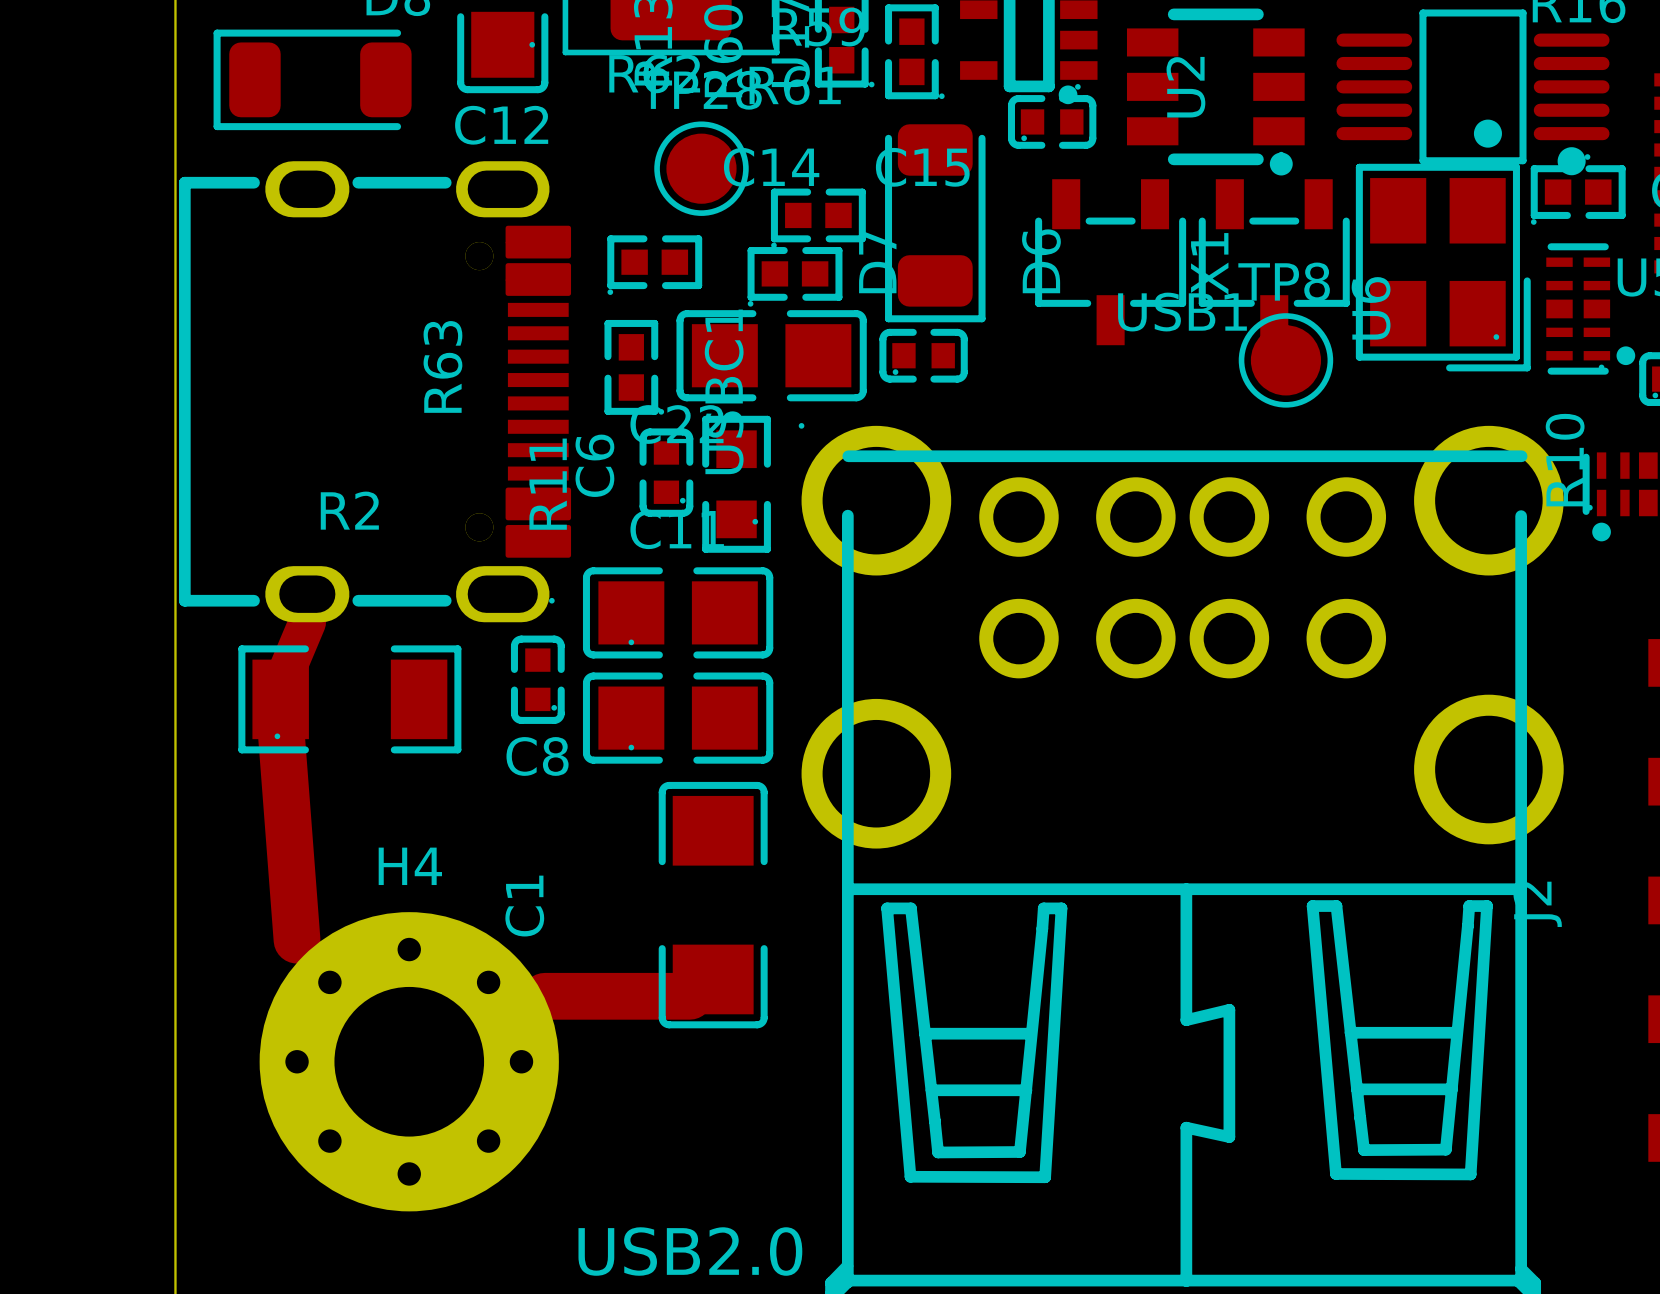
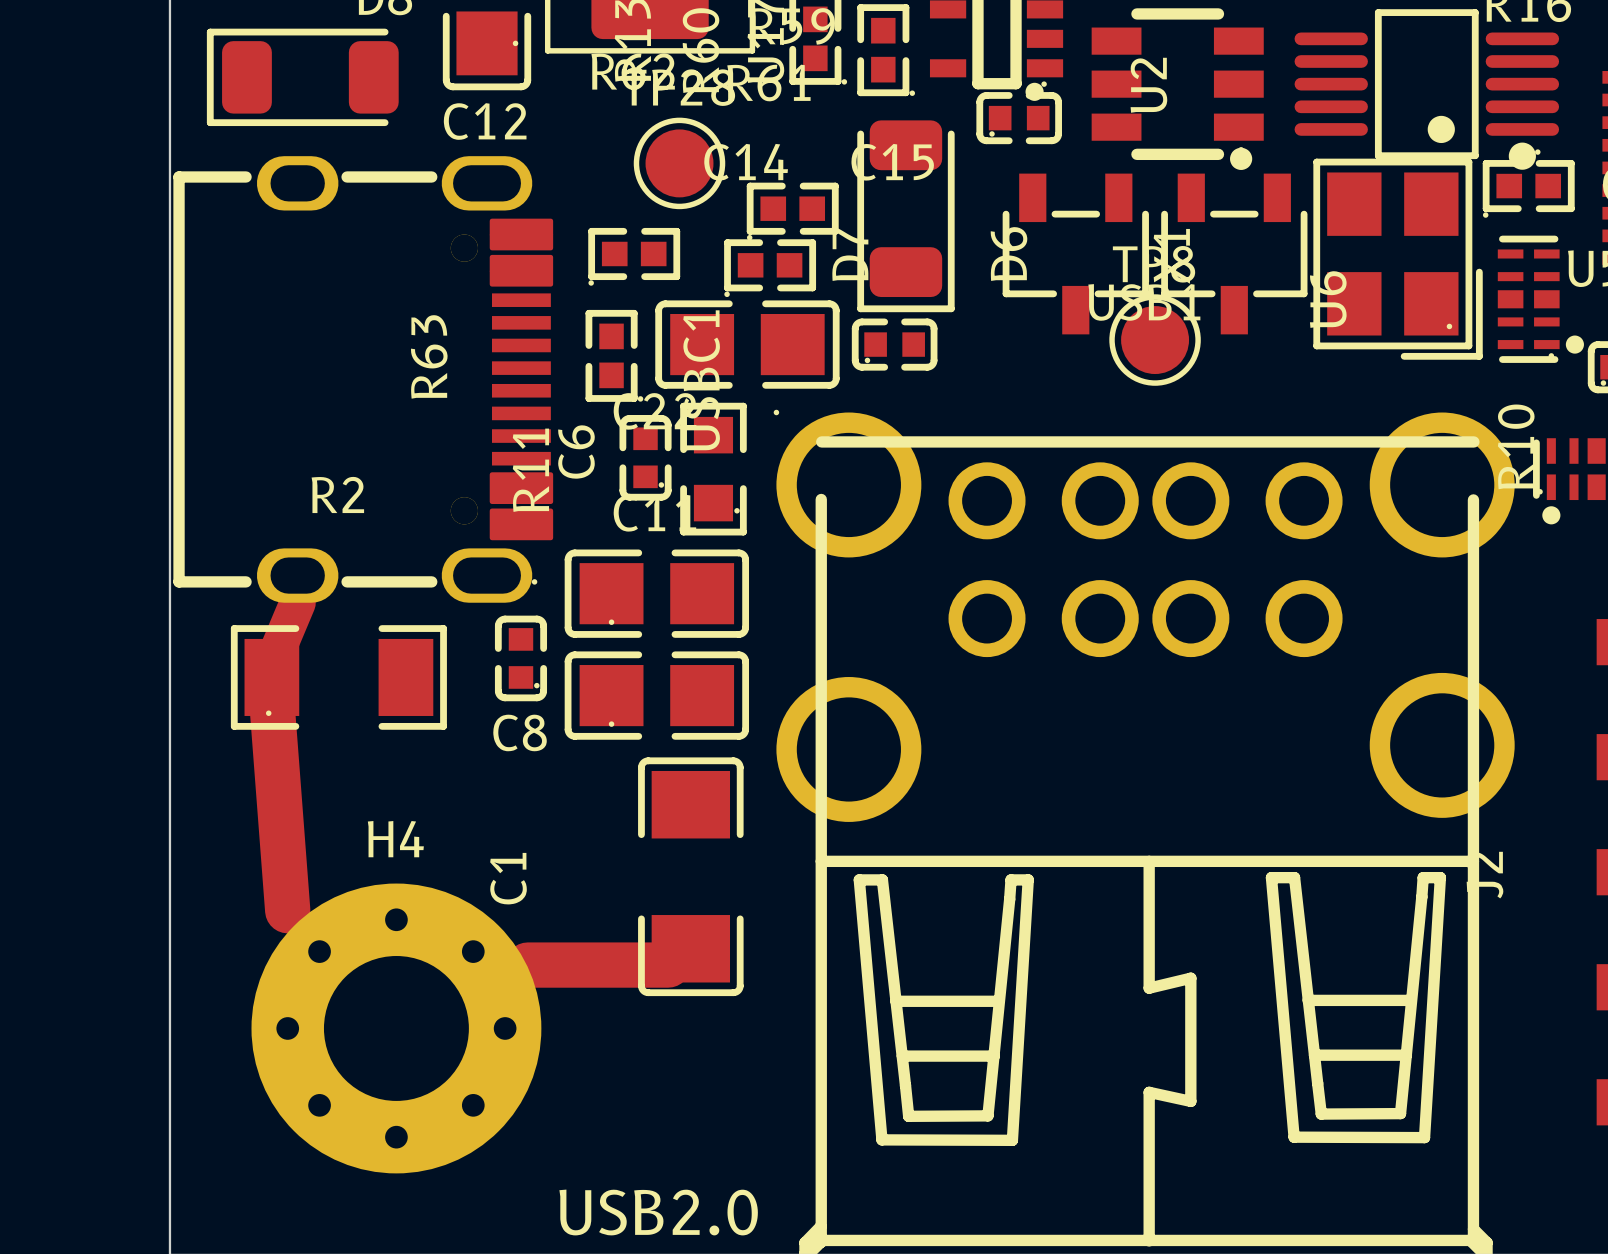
TP8 position: (1285, 360) -> (1155, 340)
R11 footprint: [702, 415, 771, 553] -> [680, 402, 747, 536]

